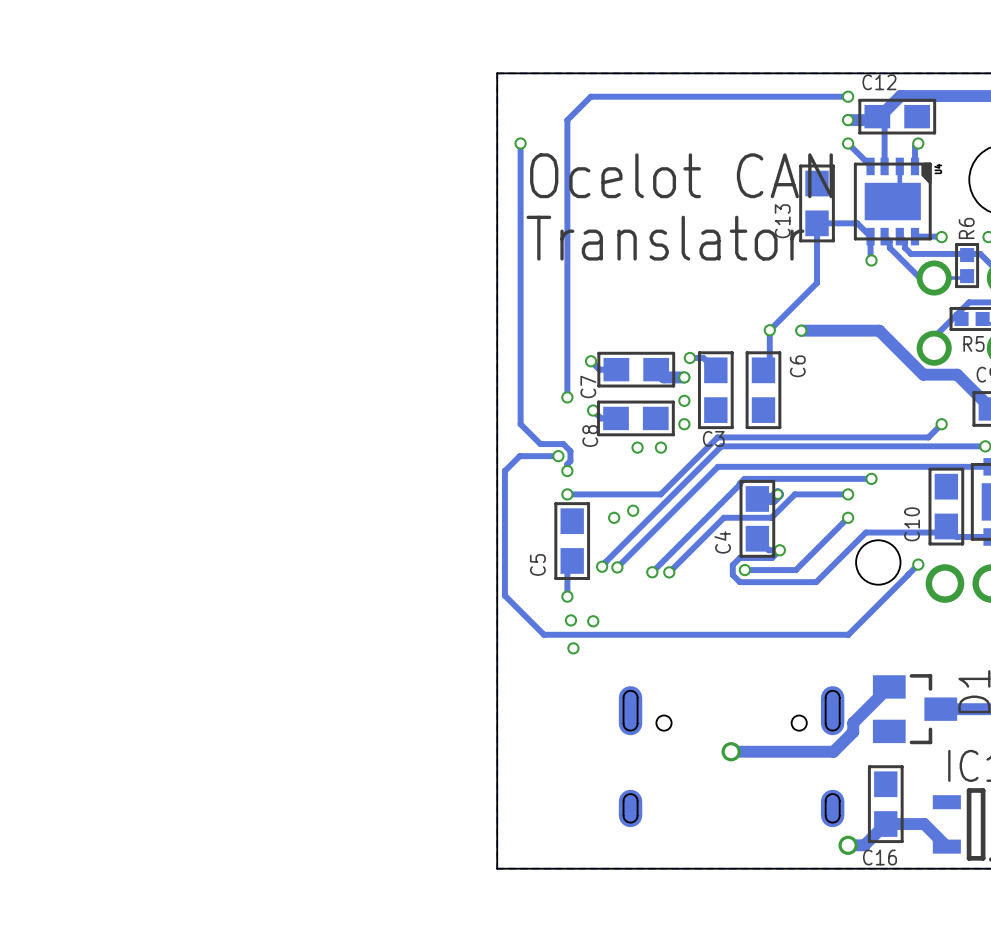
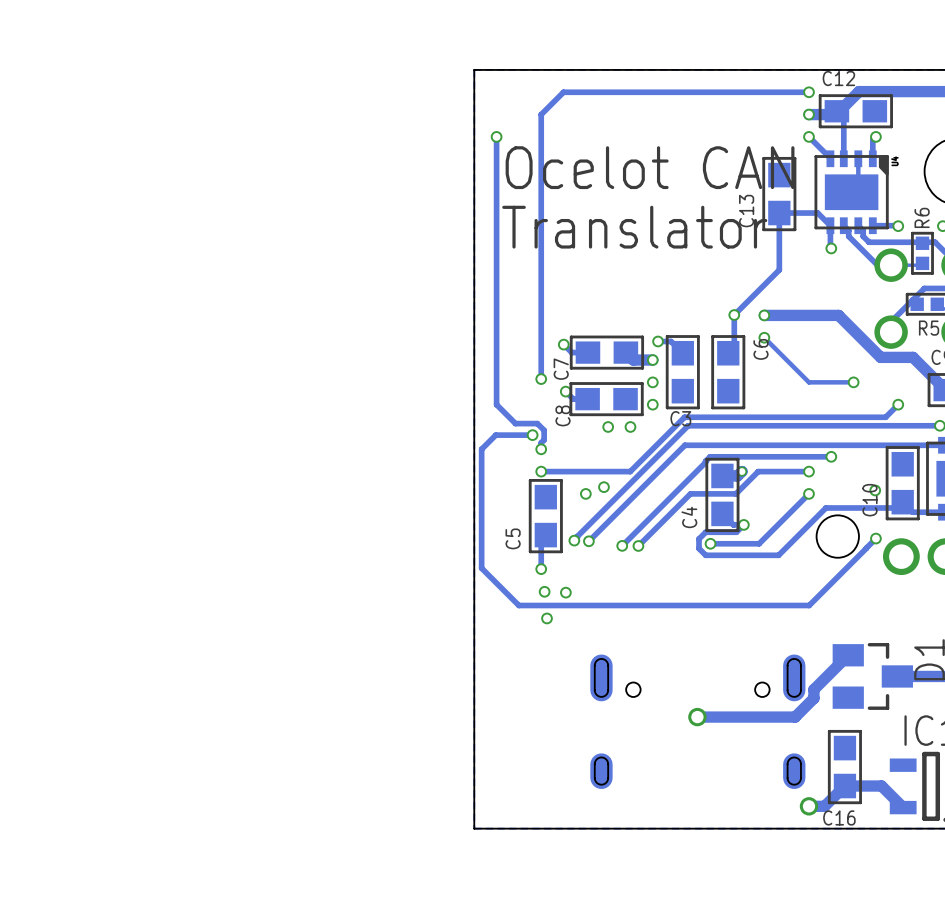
track: none -> (764, 337) (808, 382) (853, 382)
via: none -> (764, 337)
via: none -> (853, 382)
via: none -> (875, 490)

